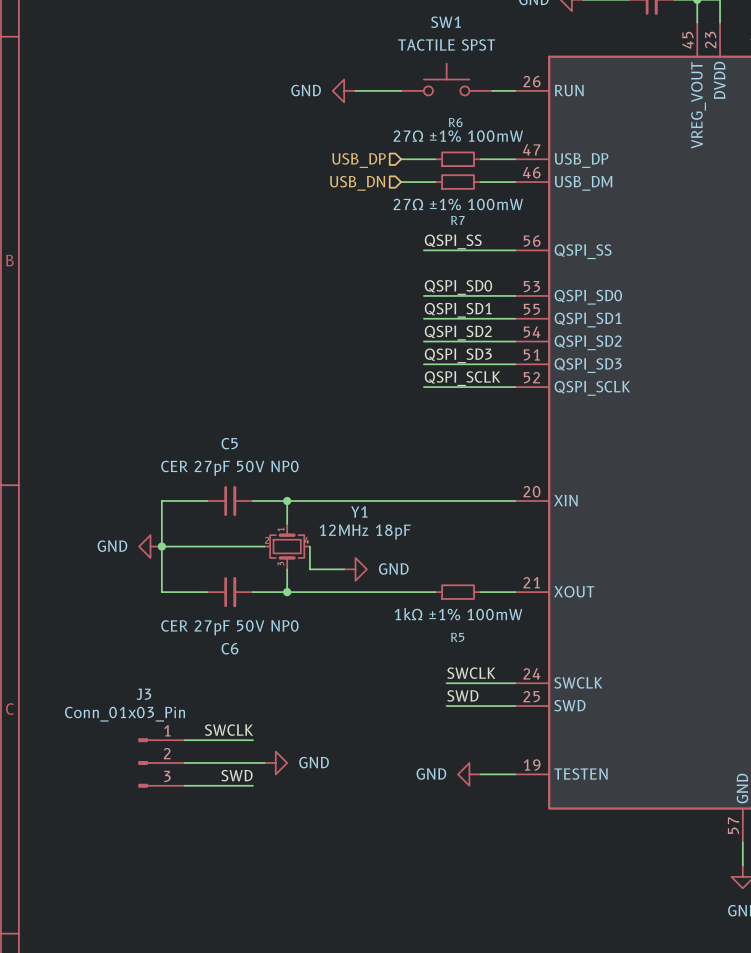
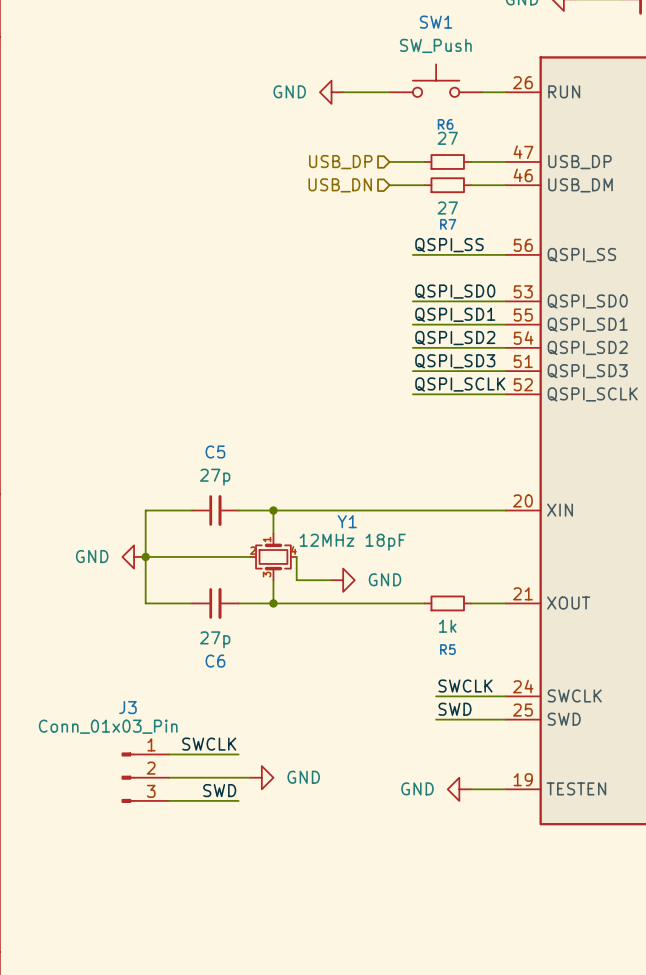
SW1 value: TACTILE SPST (446, 44) -> SW_Push (435, 45)
R6 value: 27Ω ±1% 100mW (458, 136) -> 27 (447, 138)
R7 value: 27Ω ±1% 100mW (458, 204) -> 27 (447, 208)
C5 value: CER 27pF 50V NP0 (229, 468) -> 27p (215, 477)
R5 value: 1kΩ ±1% 100mW (458, 614) -> 1k (447, 626)
C6 value: CER 27pF 50V NP0 (229, 627) -> 27p (215, 639)

